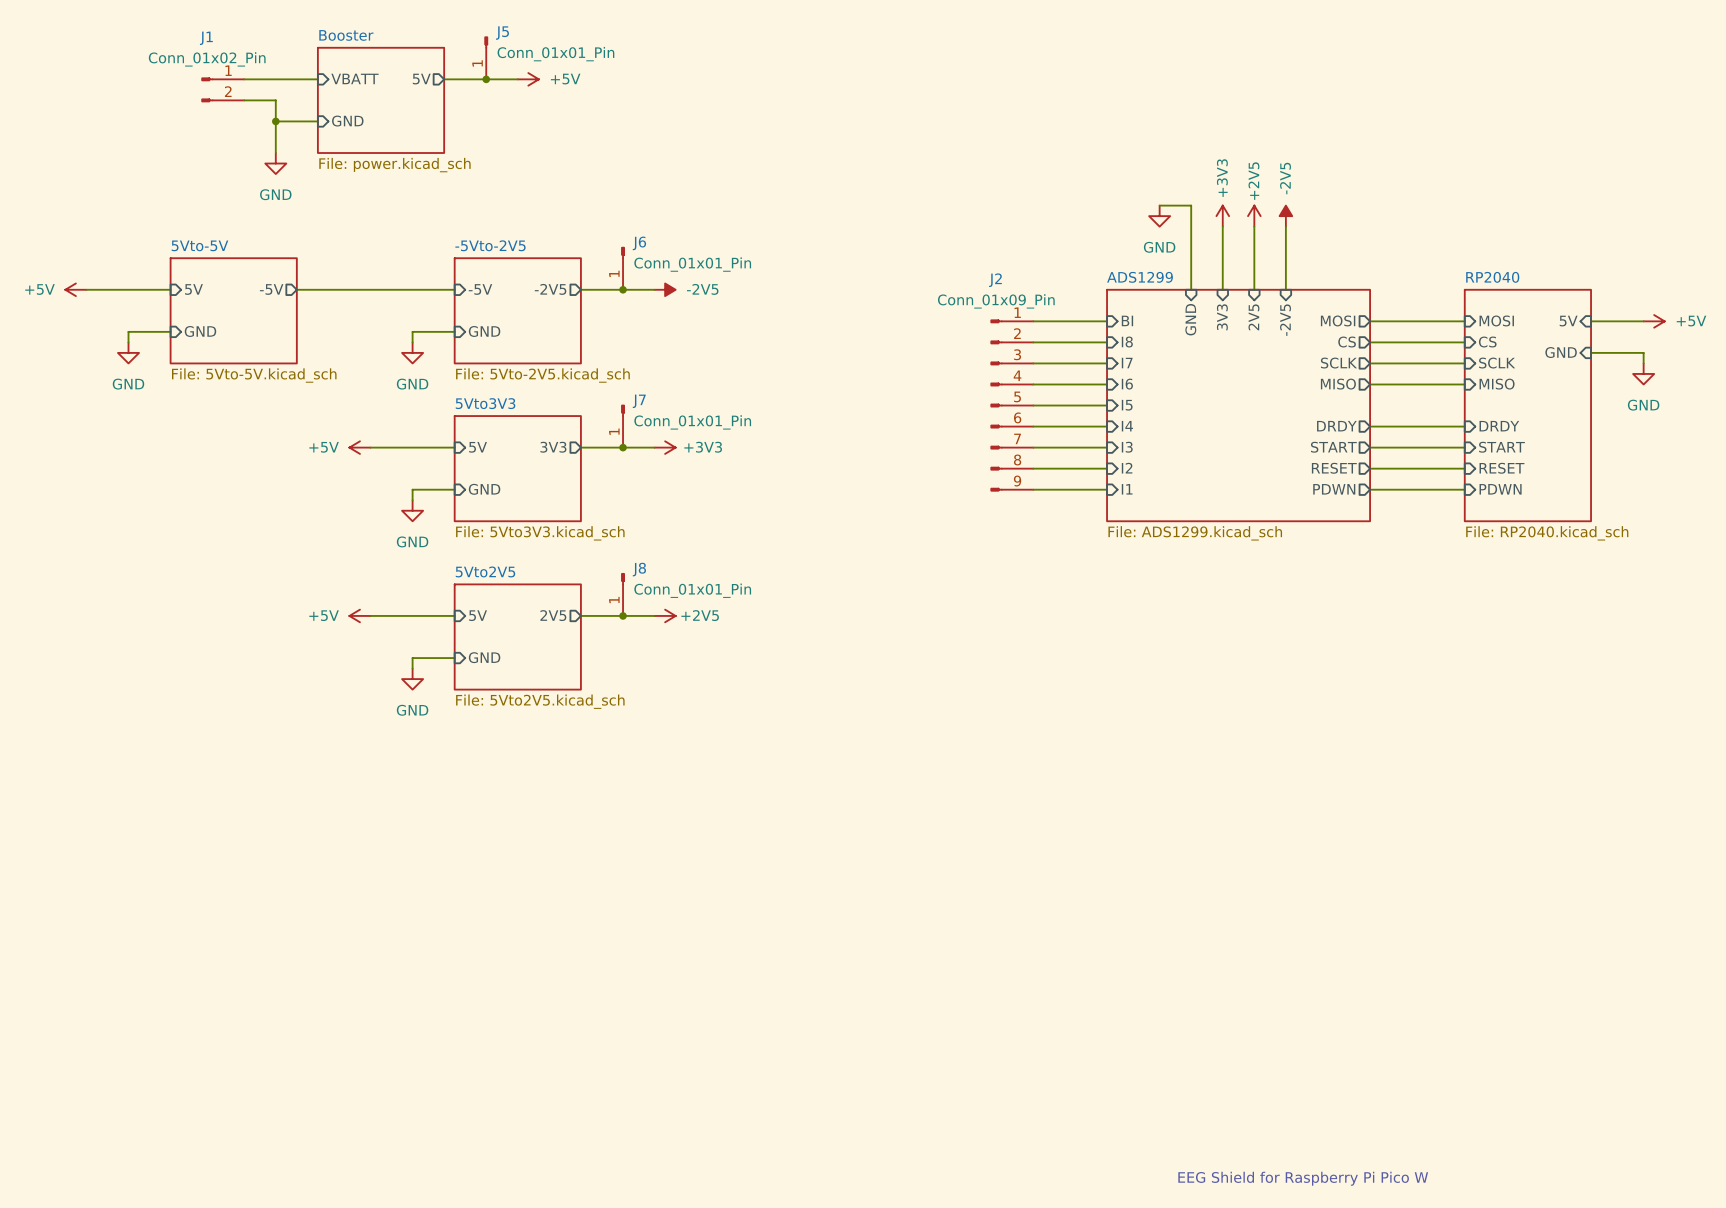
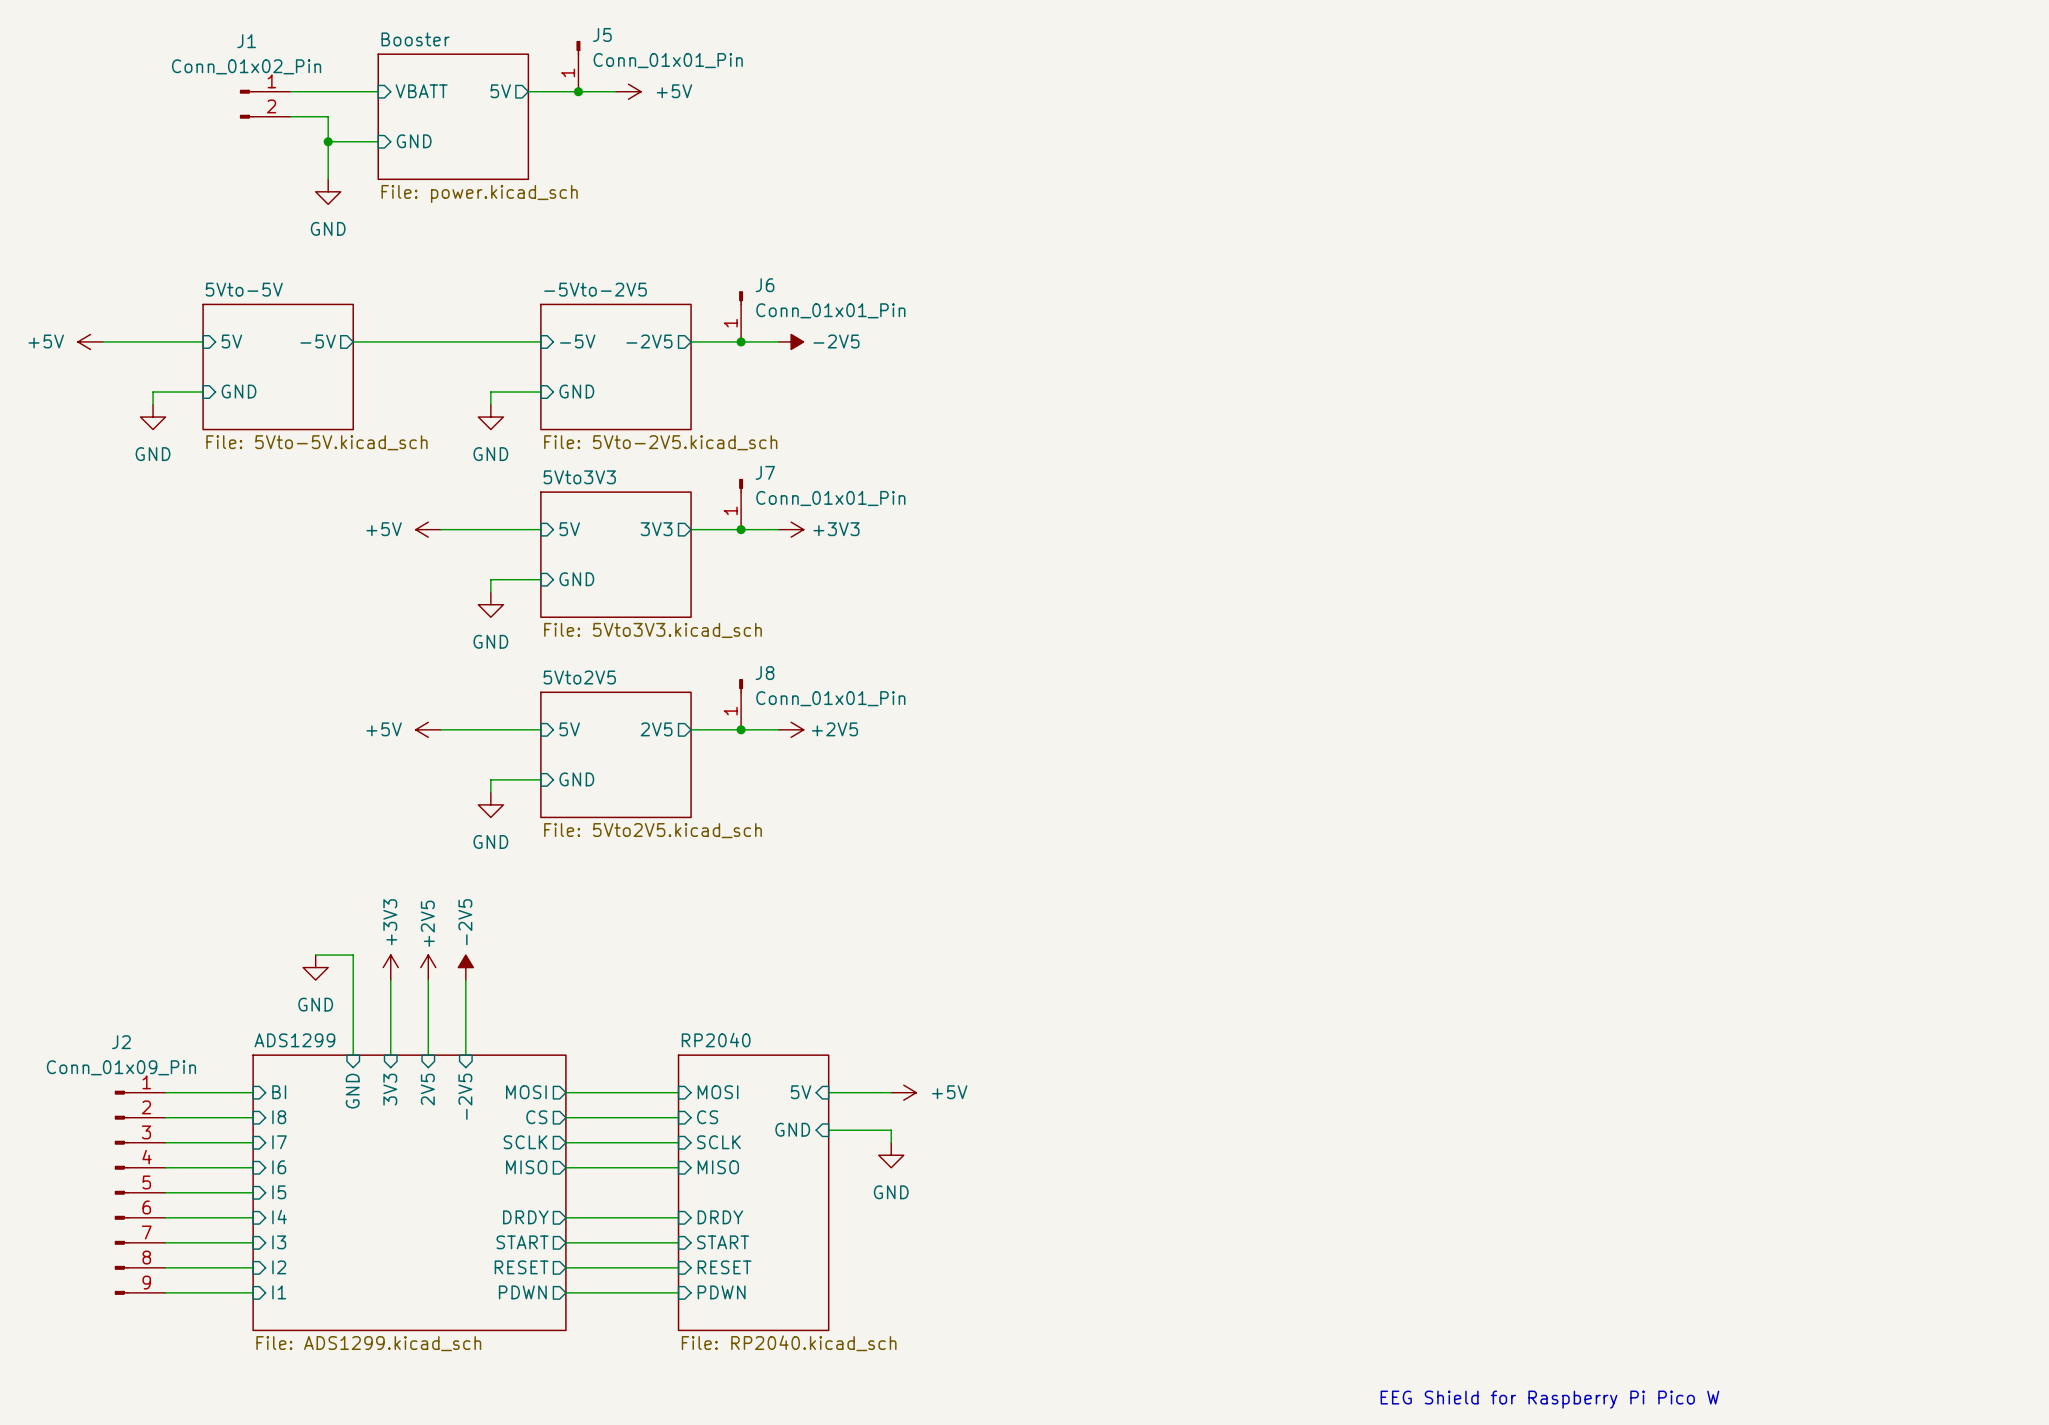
wire: (1159, 205) (1191, 205) (1191, 289) -> none
power symbol: GND (1159, 216) -> none
power symbol: +3V3 (1222, 216) -> none
power symbol: +2V5 (1254, 216) -> none
power symbol: -2V5 (1285, 216) -> none
wire: (1222, 226) (1222, 289) -> none
wire: (1254, 226) (1254, 289) -> none
wire: (1285, 226) (1285, 289) -> none
sheet pin: 3V3 (1222, 317) -> none
sheet pin: 2V5 (1253, 317) -> none
sheet pin: GND (1190, 319) -> none
sheet pin: BI (1127, 320) -> none
sheet pin: -2V5 (1285, 320) -> none
sheet pin: MOSI (1338, 320) -> none
sheet pin: MOSI (1496, 320) -> none
wire: (1033, 321) (1107, 321) -> none
wire: (1370, 321) (1464, 321) -> none
sheet pin: 5V (1568, 321) -> none
wire: (1591, 321) (1643, 321) -> none
power symbol: +5V (1654, 321) -> none
wire: (1033, 342) (1107, 342) -> none
sheet pin: I8 (1127, 342) -> none
sheet pin: CS (1347, 342) -> none
wire: (1370, 342) (1464, 342) -> none
sheet pin: CS (1487, 342) -> none
sheet pin: GND (1561, 352) -> none
wire: (1591, 352) (1643, 352) (1643, 363) -> none
wire: (1033, 363) (1107, 363) -> none
sheet pin: I7 (1127, 363) -> none
sheet pin: SCLK (1338, 363) -> none
wire: (1370, 363) (1464, 363) -> none
sheet pin: SCLK (1497, 363) -> none
power symbol: GND (1643, 373) -> none
wire: (1033, 384) (1107, 384) -> none
sheet pin: I6 (1127, 384) -> none
sheet pin: MISO (1338, 384) -> none
wire: (1370, 384) (1464, 384) -> none
sheet pin: MISO (1497, 384) -> none
J2 position: (1012, 405) -> (140, 1192)
wire: (1033, 405) (1107, 405) -> none
sheet pin: I5 (1127, 405) -> none
sheet ADS1299 position: (1238, 405) -> (409, 1192)
sheet RP2040 position: (1527, 405) -> (753, 1192)
wire: (1033, 426) (1107, 426) -> none
sheet pin: I4 (1127, 426) -> none
sheet pin: DRDY (1336, 426) -> none
wire: (1370, 426) (1464, 426) -> none
sheet pin: DRDY (1499, 426) -> none
wire: (1033, 447) (1107, 447) -> none
sheet pin: I3 (1127, 447) -> none
sheet pin: START (1333, 447) -> none
wire: (1370, 447) (1464, 447) -> none
sheet pin: START (1501, 447) -> none
wire: (1033, 468) (1107, 468) -> none
sheet pin: I2 (1127, 468) -> none
sheet pin: RESET (1334, 468) -> none
wire: (1370, 468) (1464, 468) -> none
sheet pin: RESET (1501, 468) -> none
wire: (1033, 489) (1107, 489) -> none
sheet pin: I1 (1127, 489) -> none
sheet pin: PDWN (1334, 489) -> none
wire: (1370, 489) (1464, 489) -> none
sheet pin: PDWN (1500, 489) -> none
wire: none -> (315, 955) (353, 955) (353, 1055)
power symbol: none -> GND (315, 967)
power symbol: none -> +3V3 (390, 967)
power symbol: none -> +2V5 (428, 967)
power symbol: none -> -2V5 (465, 967)
wire: none -> (390, 980) (390, 1055)
wire: none -> (428, 980) (428, 1055)
wire: none -> (465, 980) (465, 1055)
sheet pin: none -> 3V3 (390, 1089)
sheet pin: none -> 2V5 (427, 1089)
sheet pin: none -> GND (352, 1091)
sheet pin: none -> -2V5 (465, 1096)
sheet pin: none -> BI (279, 1092)
sheet pin: none -> MOSI (526, 1092)
sheet pin: none -> MOSI (718, 1092)
sheet pin: none -> 5V (801, 1092)
wire: none -> (165, 1092) (253, 1092)
wire: none -> (565, 1092) (678, 1092)
wire: none -> (828, 1092) (891, 1092)
power symbol: none -> +5V (903, 1092)
sheet pin: none -> I8 (279, 1117)
sheet pin: none -> CS (536, 1117)
sheet pin: none -> CS (707, 1117)
wire: none -> (165, 1117) (253, 1117)
wire: none -> (565, 1117) (678, 1117)
sheet pin: none -> GND (792, 1129)
wire: none -> (828, 1130) (891, 1130) (891, 1142)
sheet pin: none -> I7 (279, 1142)
sheet pin: none -> SCLK (525, 1142)
sheet pin: none -> SCLK (718, 1142)
wire: none -> (165, 1142) (253, 1142)
wire: none -> (565, 1142) (678, 1142)
power symbol: none -> GND (891, 1155)
sheet pin: none -> I6 (279, 1167)
sheet pin: none -> MISO (526, 1167)
sheet pin: none -> MISO (718, 1167)
wire: none -> (165, 1167) (253, 1167)
wire: none -> (565, 1167) (678, 1167)
sheet pin: none -> I5 (279, 1192)
wire: none -> (165, 1192) (253, 1192)
sheet pin: none -> I4 (279, 1217)
sheet pin: none -> DRDY (525, 1217)
sheet pin: none -> DRDY (720, 1217)
wire: none -> (165, 1217) (253, 1217)
wire: none -> (565, 1217) (678, 1217)
sheet pin: none -> I3 (279, 1242)
sheet pin: none -> START (522, 1242)
sheet pin: none -> START (723, 1242)
wire: none -> (165, 1242) (253, 1242)
wire: none -> (565, 1242) (678, 1242)
sheet pin: none -> I2 (279, 1267)
wire: none -> (165, 1267) (253, 1267)
sheet pin: none -> RESET (521, 1267)
wire: none -> (565, 1267) (678, 1267)
sheet pin: none -> RESET (724, 1267)
wire: none -> (165, 1292) (253, 1292)
sheet pin: none -> I1 (279, 1292)
sheet pin: none -> PDWN (522, 1292)
wire: none -> (565, 1292) (678, 1292)
sheet pin: none -> PDWN (721, 1292)

